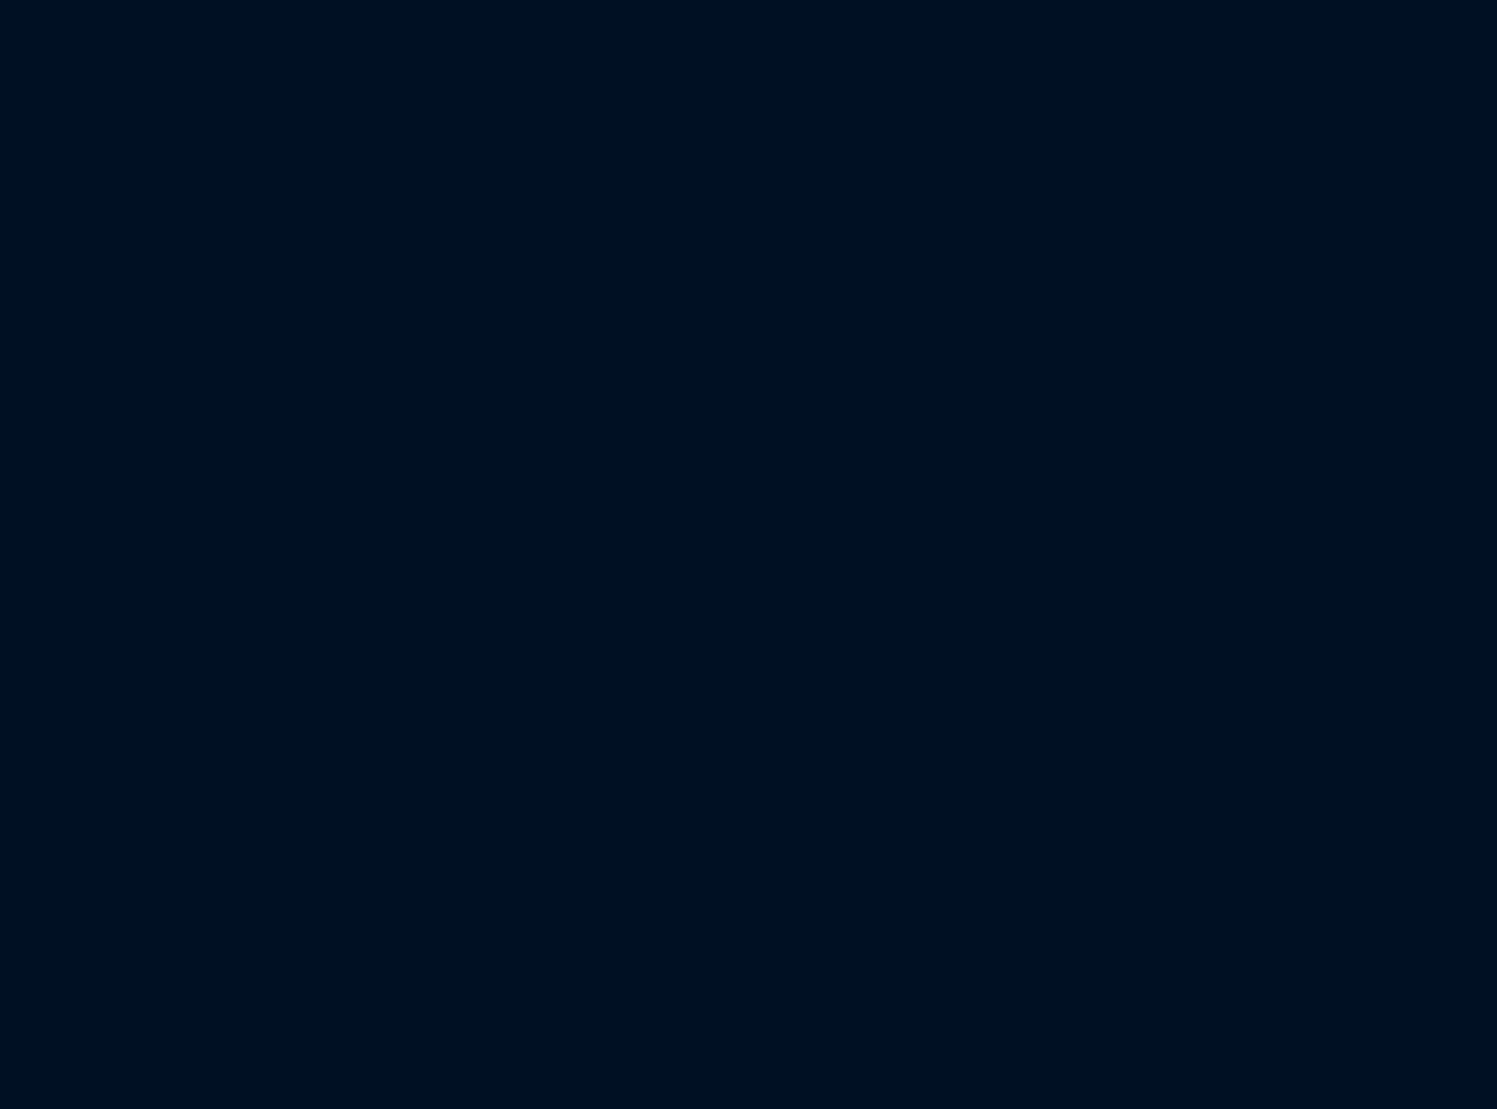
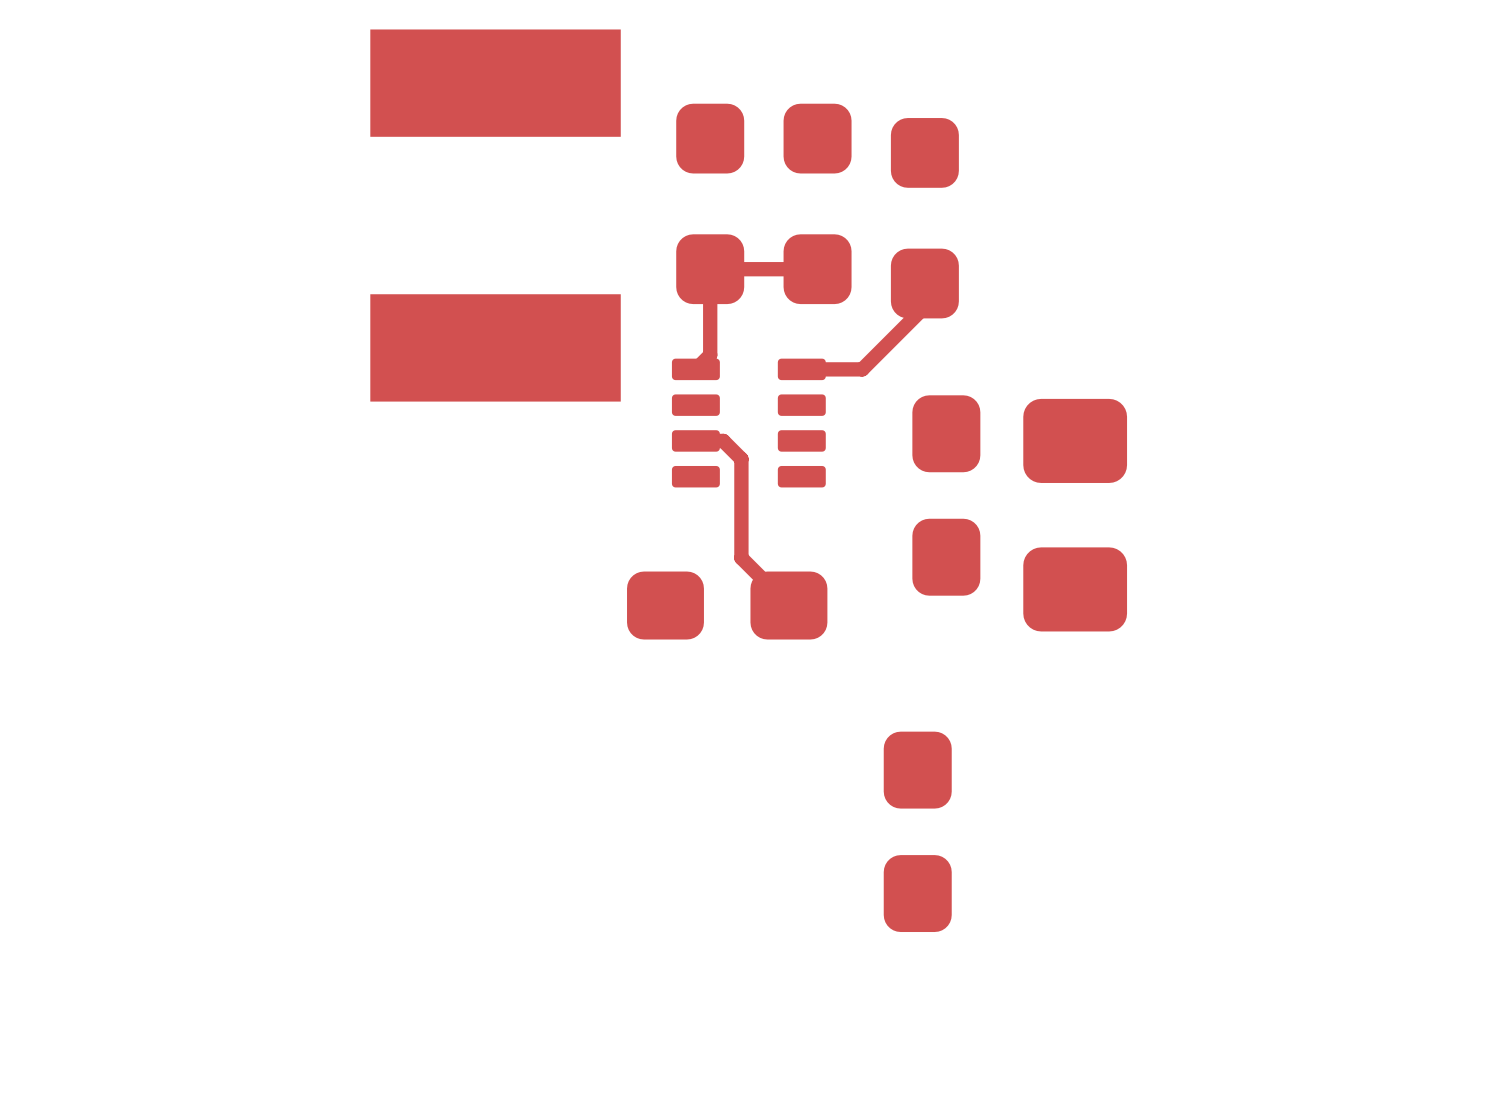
part: none -> (710, 203)
part: none -> (817, 203)
part: none -> (495, 215)
part: none -> (924, 218)
top track: none -> (817, 269) (710, 269) (710, 355) (695, 369)
top track: none -> (932, 299) (862, 369) (801, 369)
part: none -> (748, 423)
top track: none -> (695, 440) (723, 440) (741, 459) (741, 558) (788, 605)
part: none -> (946, 495)
part: none -> (1075, 515)
part: none -> (727, 605)
part: none -> (917, 831)

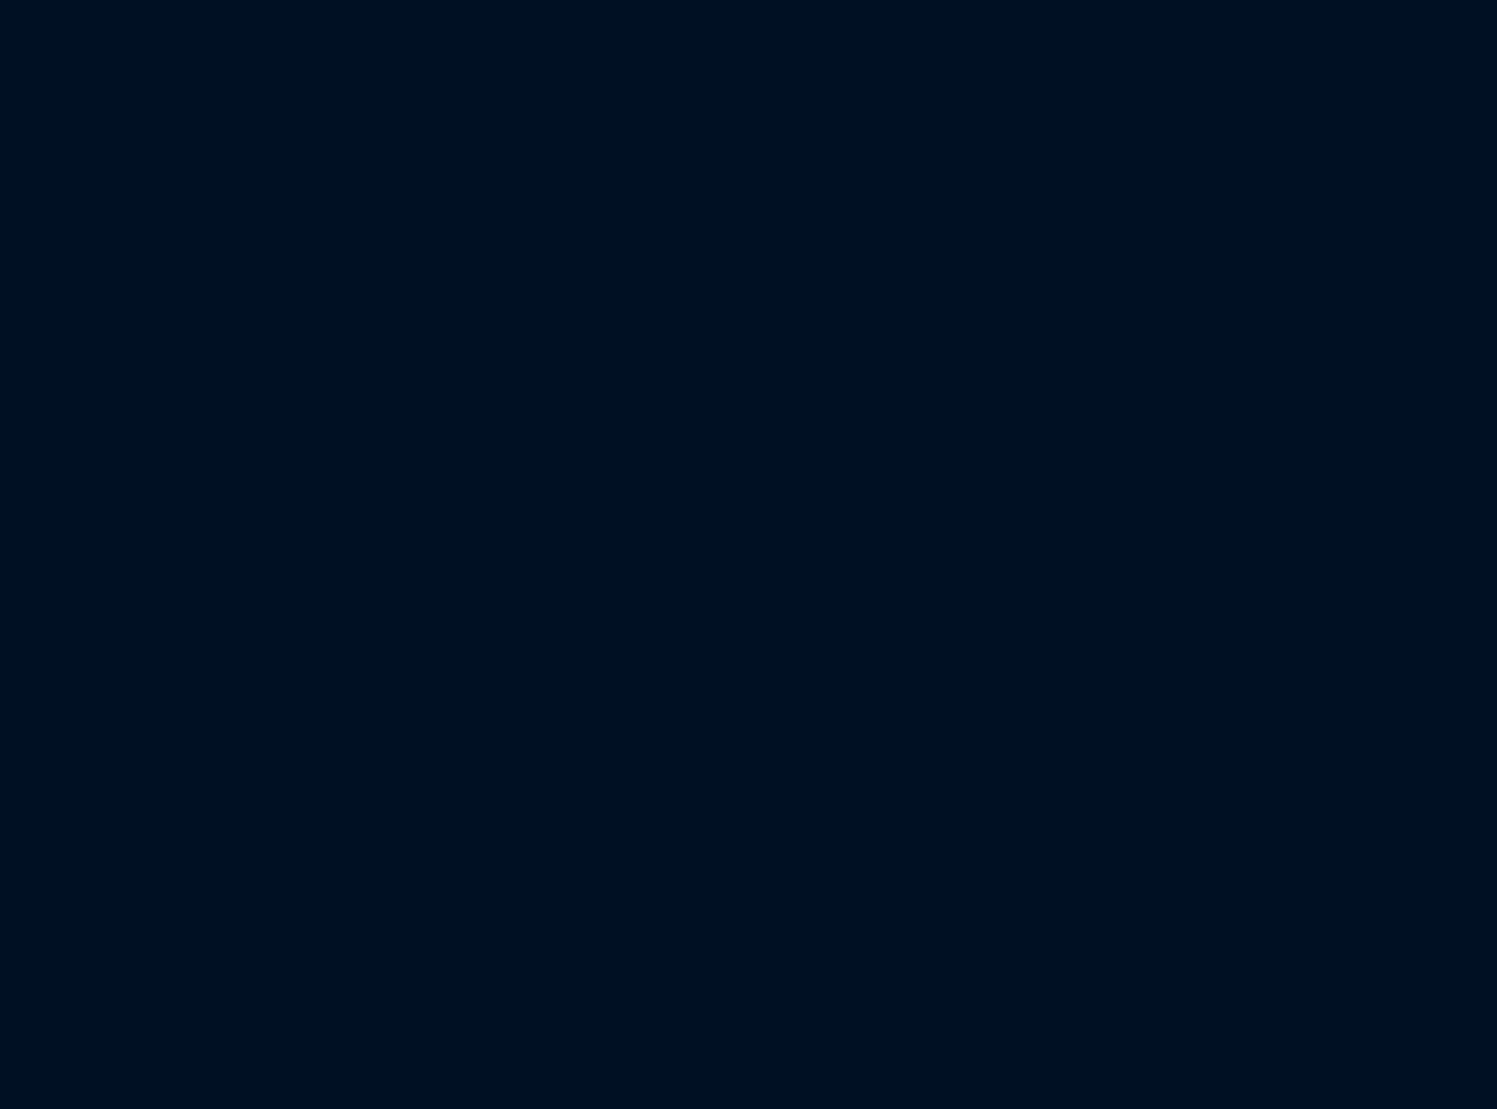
part: (710, 203) -> none
part: (817, 203) -> none
part: (495, 215) -> none
part: (924, 218) -> none
top track: (817, 269) (710, 269) (710, 355) (695, 369) -> none
top track: (932, 299) (862, 369) (801, 369) -> none
part: (748, 423) -> none
top track: (695, 440) (723, 440) (741, 459) (741, 558) (788, 605) -> none
part: (946, 495) -> none
part: (1075, 515) -> none
part: (727, 605) -> none
part: (917, 831) -> none

